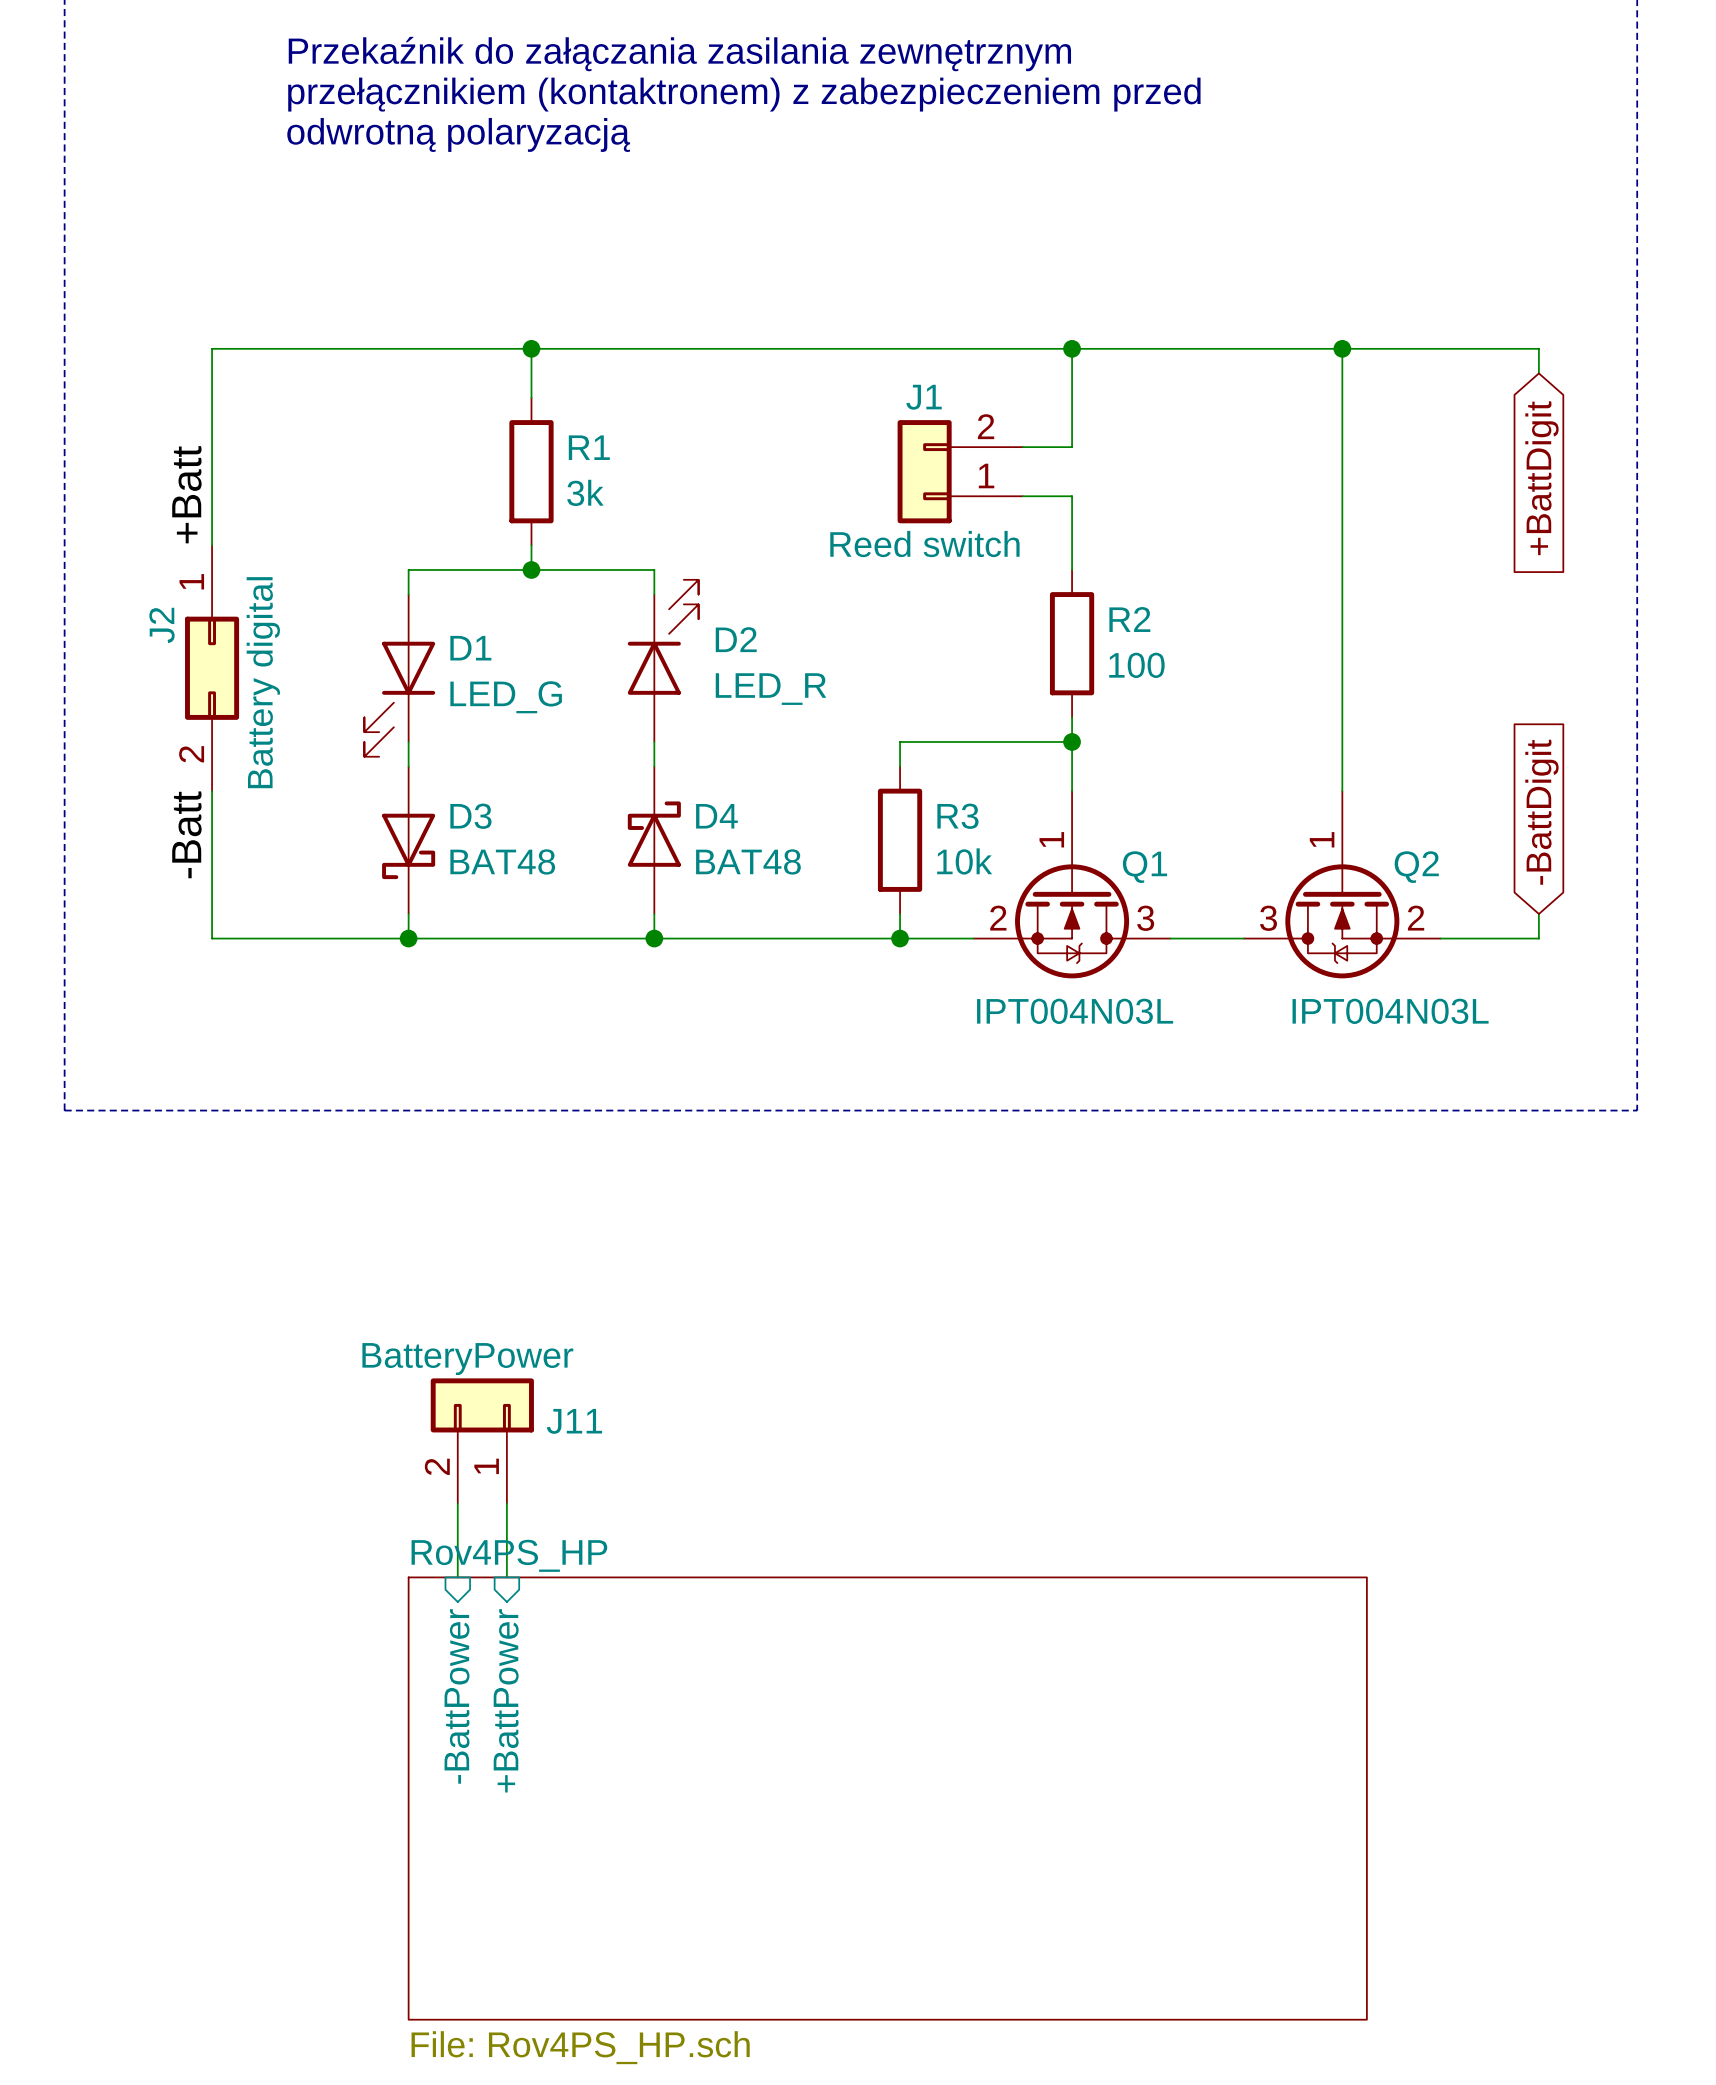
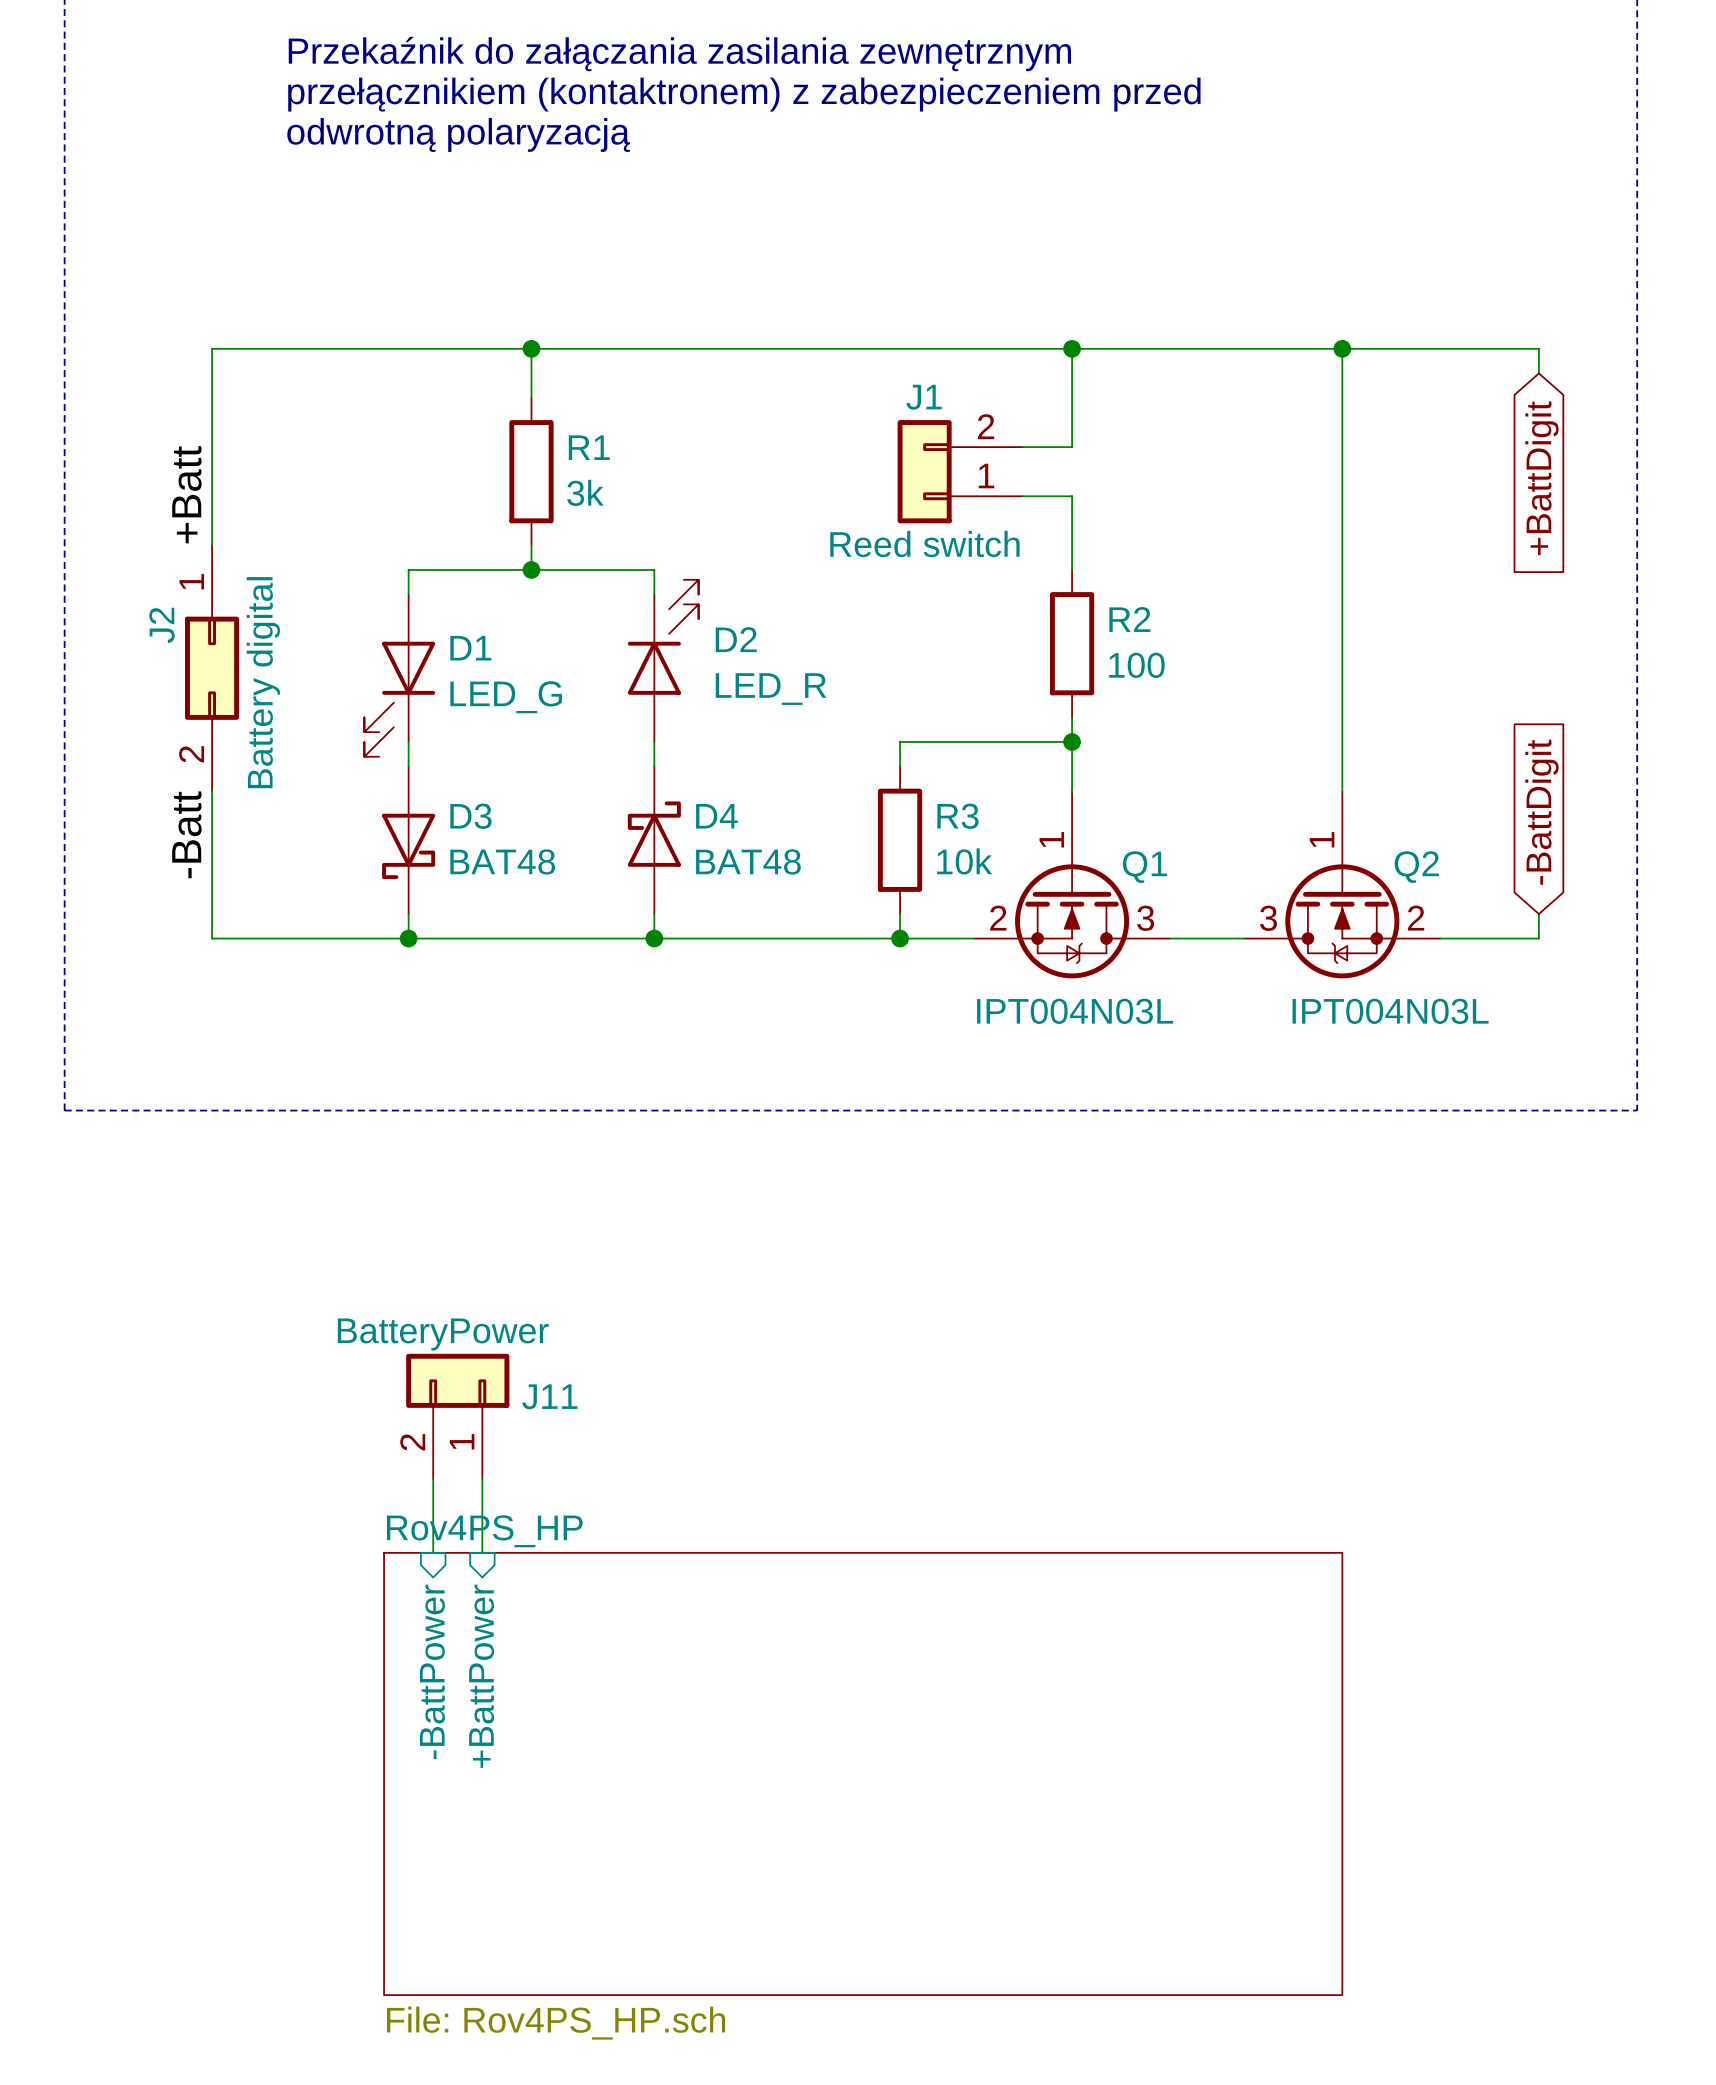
J11 position: (482, 1441) -> (457, 1416)
wire: (457, 1503) (457, 1577) -> (433, 1479) (433, 1552)
wire: (506, 1503) (506, 1577) -> (482, 1479) (482, 1552)
sheet pin position: -BattPower (457, 1696) -> -BattPower (432, 1671)
sheet pin position: +BattPower (506, 1700) -> +BattPower (481, 1676)
sheet Rov4PS_HP position: (887, 1798) -> (863, 1773)

